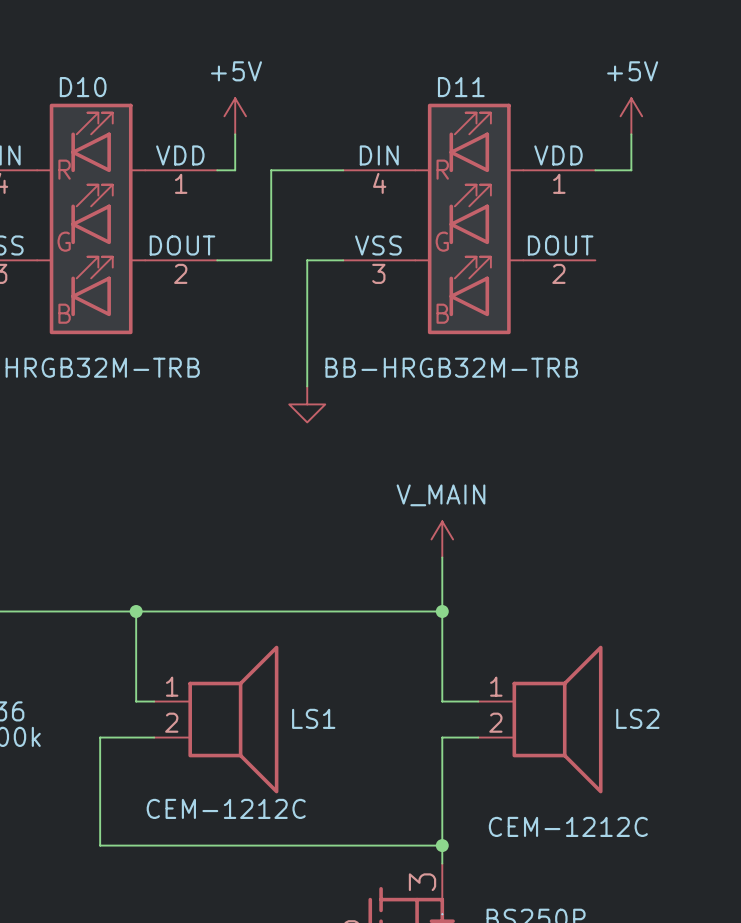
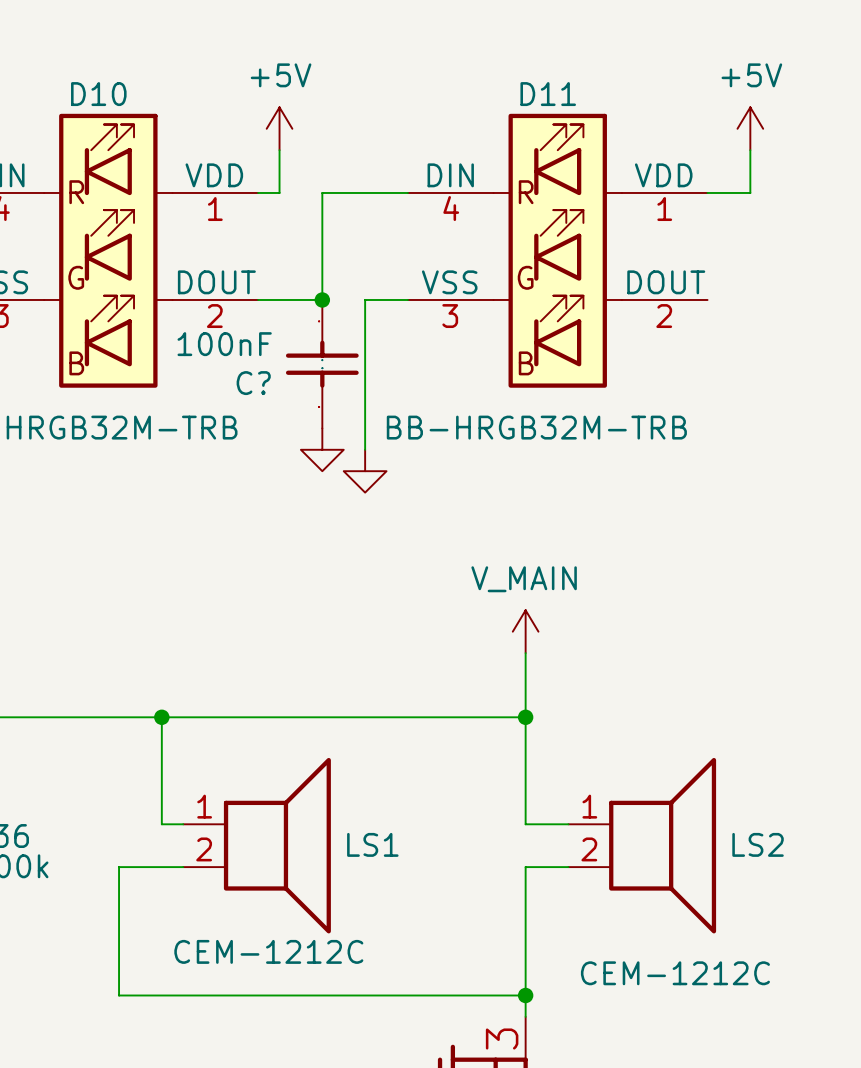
junction: none -> (322, 299)
C?: none -> (322, 364)
power symbol: none -> (322, 449)

